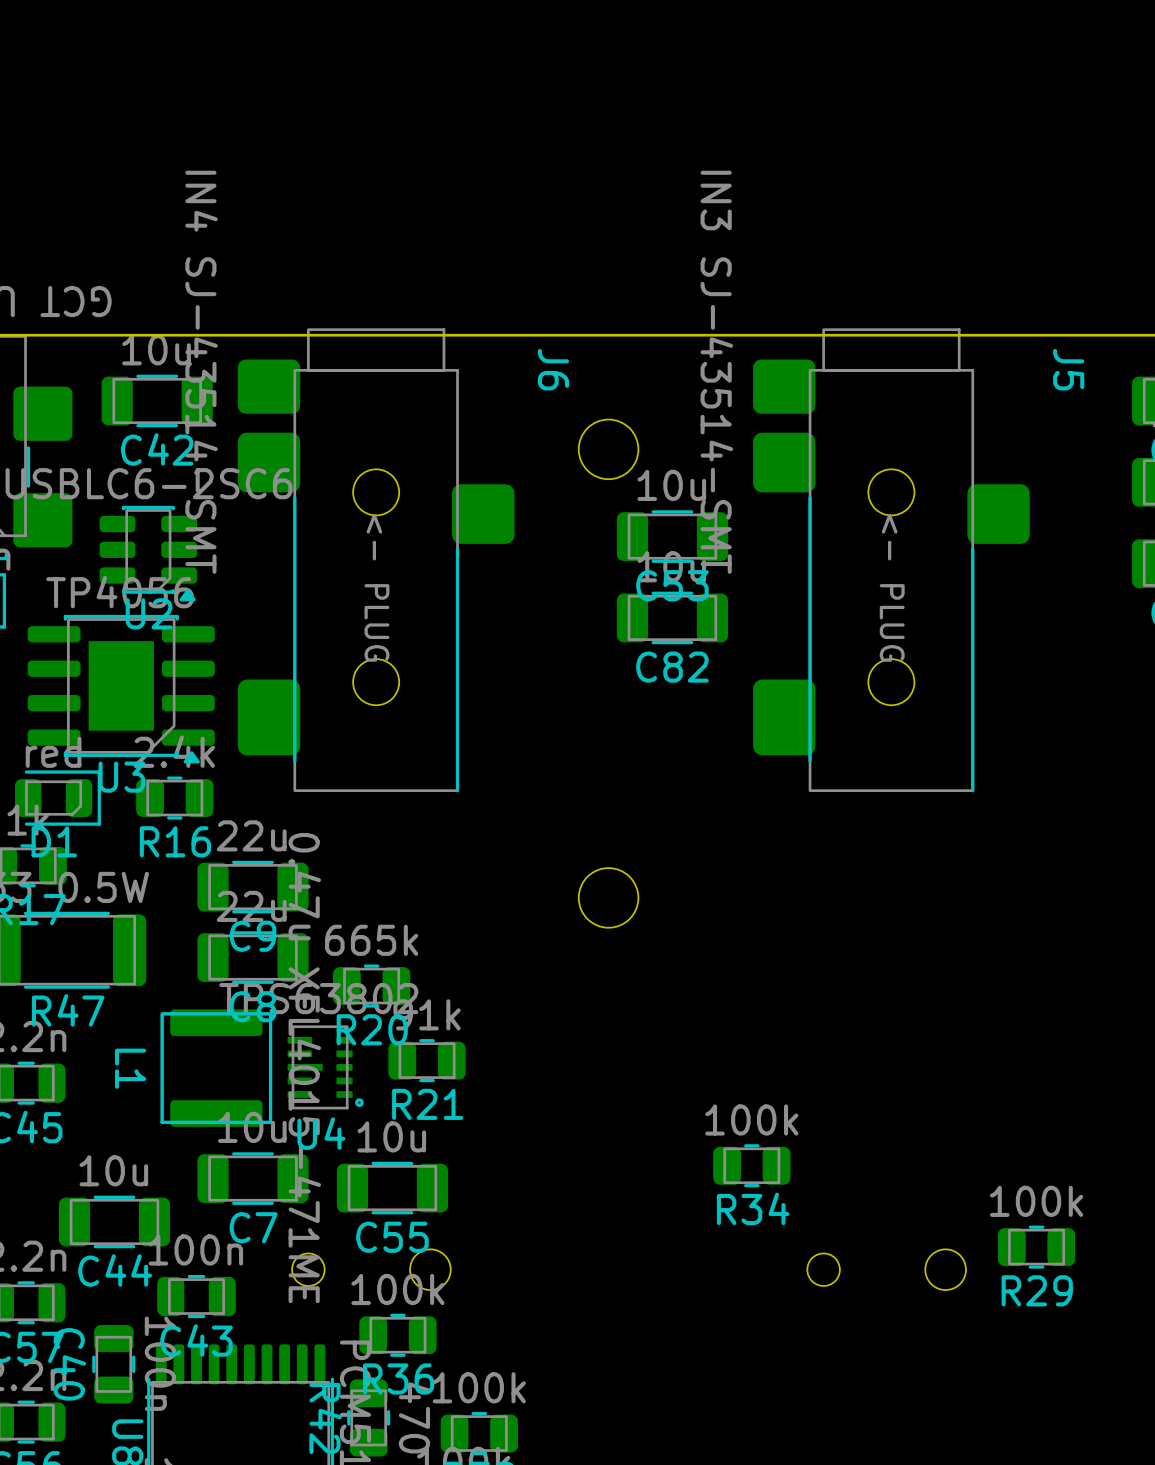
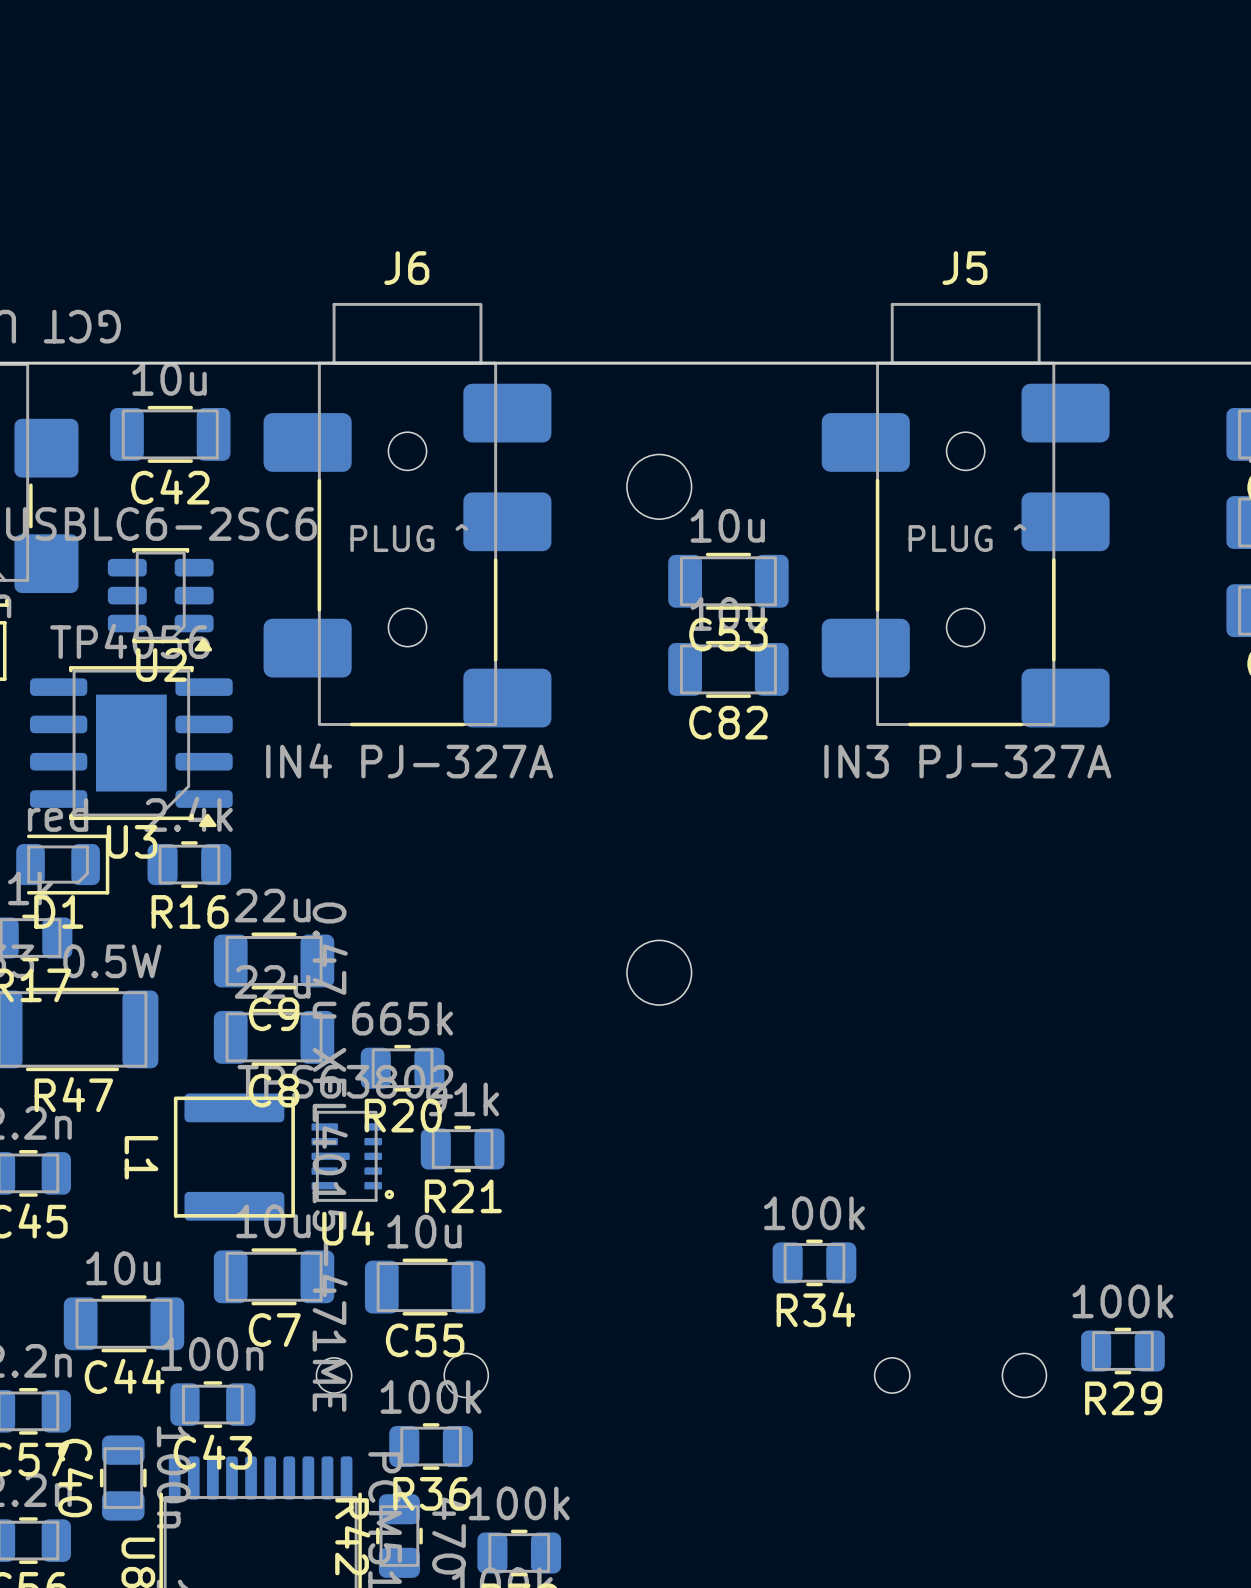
J6 footprint: [237, 328, 515, 793] -> [263, 302, 552, 728]
J5 footprint: [753, 328, 1030, 793] -> [821, 302, 1110, 728]
J6 name position: J6 (553, 369) -> J6 (406, 268)
J5 name position: J5 (1068, 369) -> J5 (964, 268)
J6 value: IN4 SJ-43514-SMT (201, 372) -> IN4 PJ-327A (409, 760)
J5 value: IN3 SJ-43514-SMT (716, 372) -> IN3 PJ-327A (967, 761)

